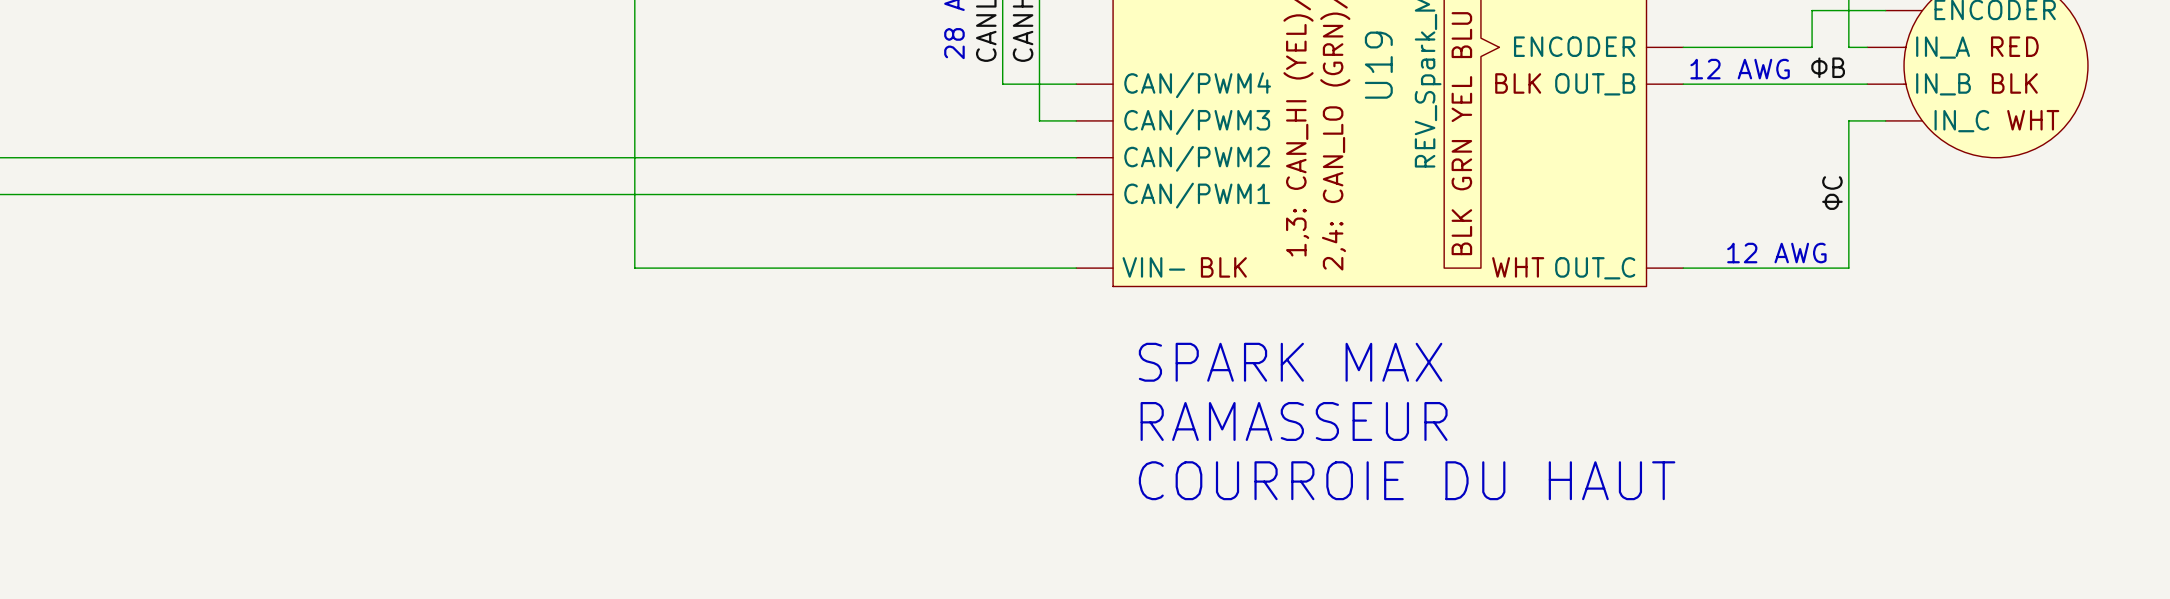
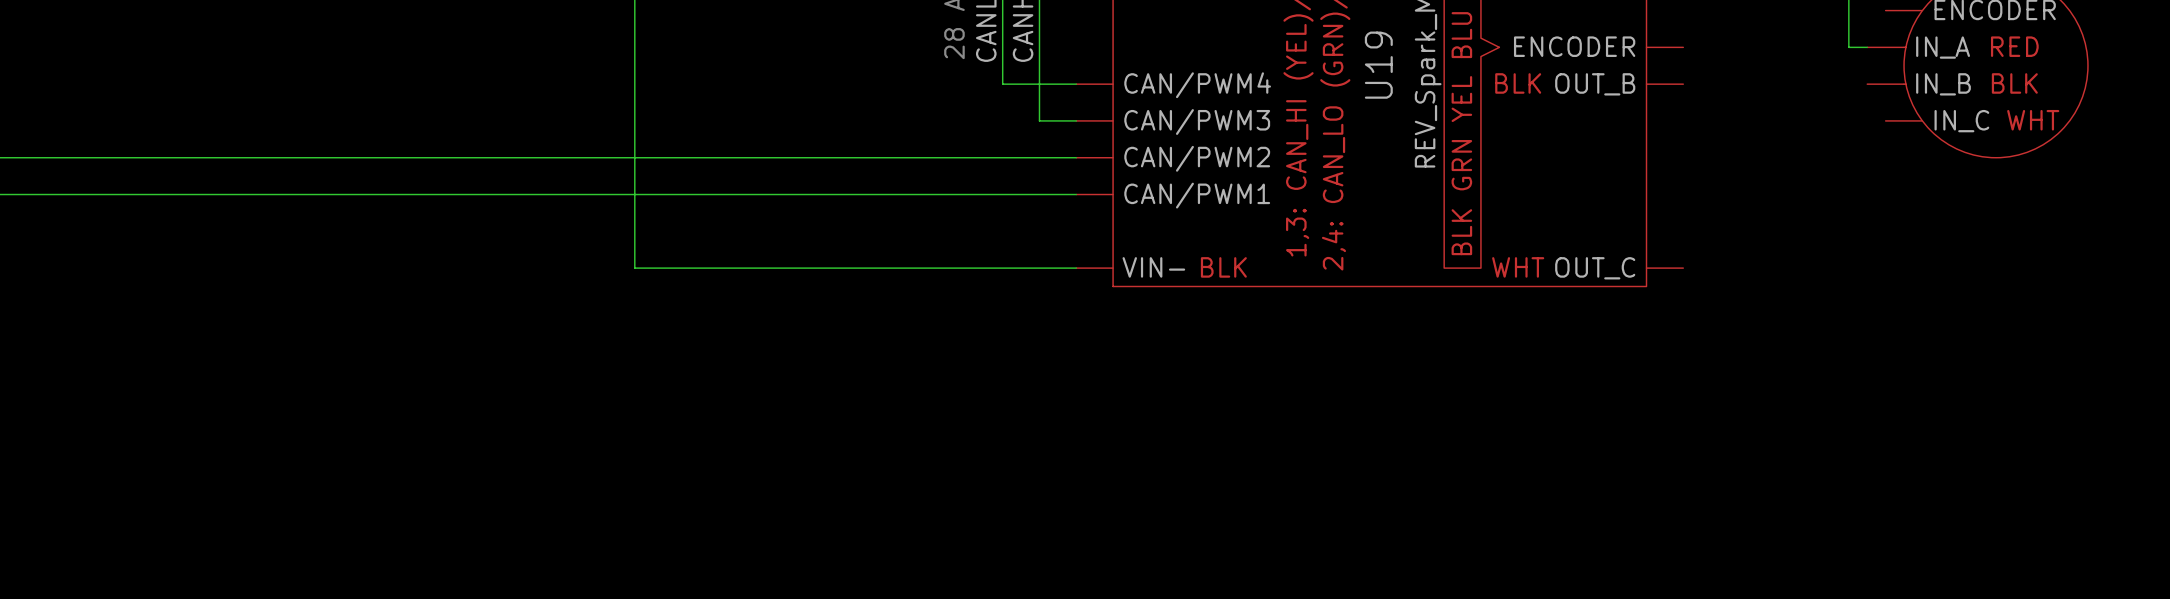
wire: (1885, 10) (1812, 10) (1812, 47) (1683, 47) -> none
label: ΦB (1828, 67) -> none
text: 12 AWG (1740, 69) -> none
wire: (1683, 84) (1867, 84) -> none
wire: (1885, 120) (1848, 120) (1848, 268) (1683, 268) -> none
label: ΦC (1832, 193) -> none
text: 12 AWG (1776, 253) -> none
text: SPARK MAX (1290, 362) -> none
text: RAMASSEUR (1294, 421) -> none
text: COURROIE DU HAUT (1407, 480) -> none

